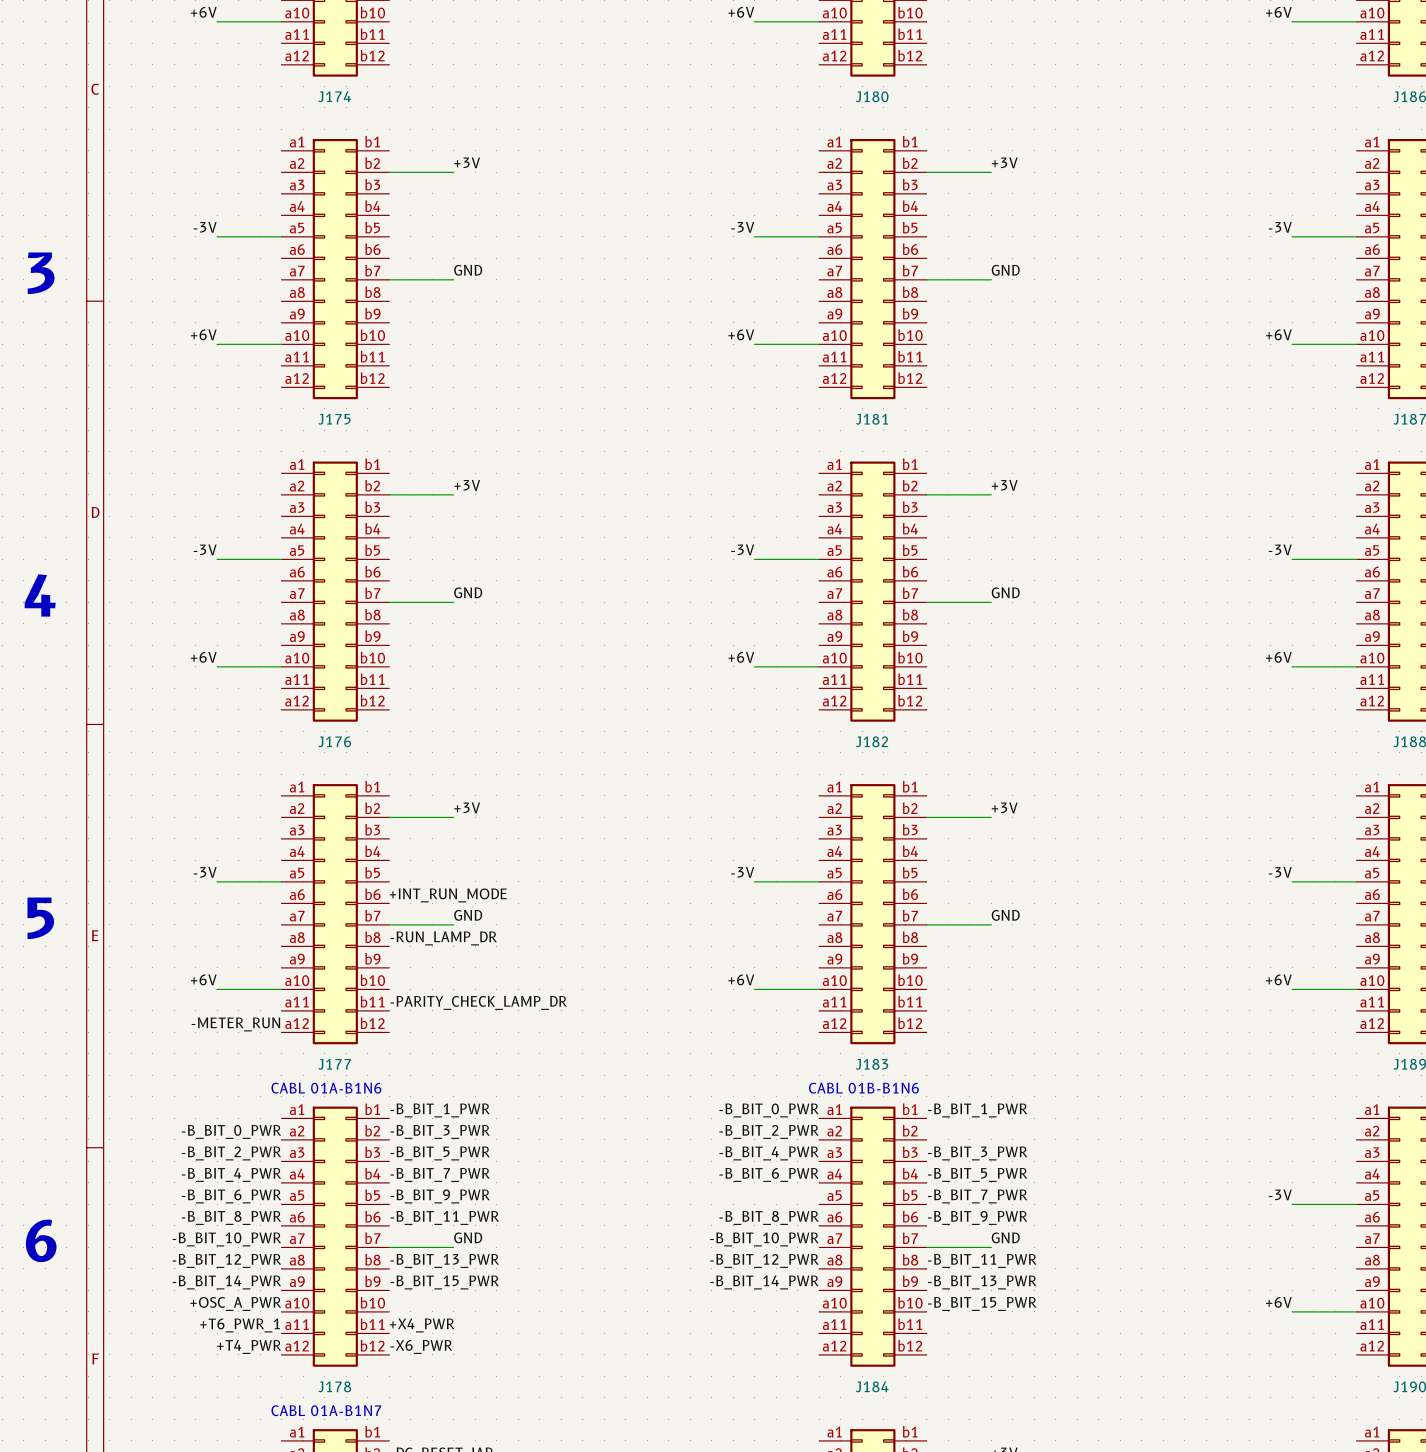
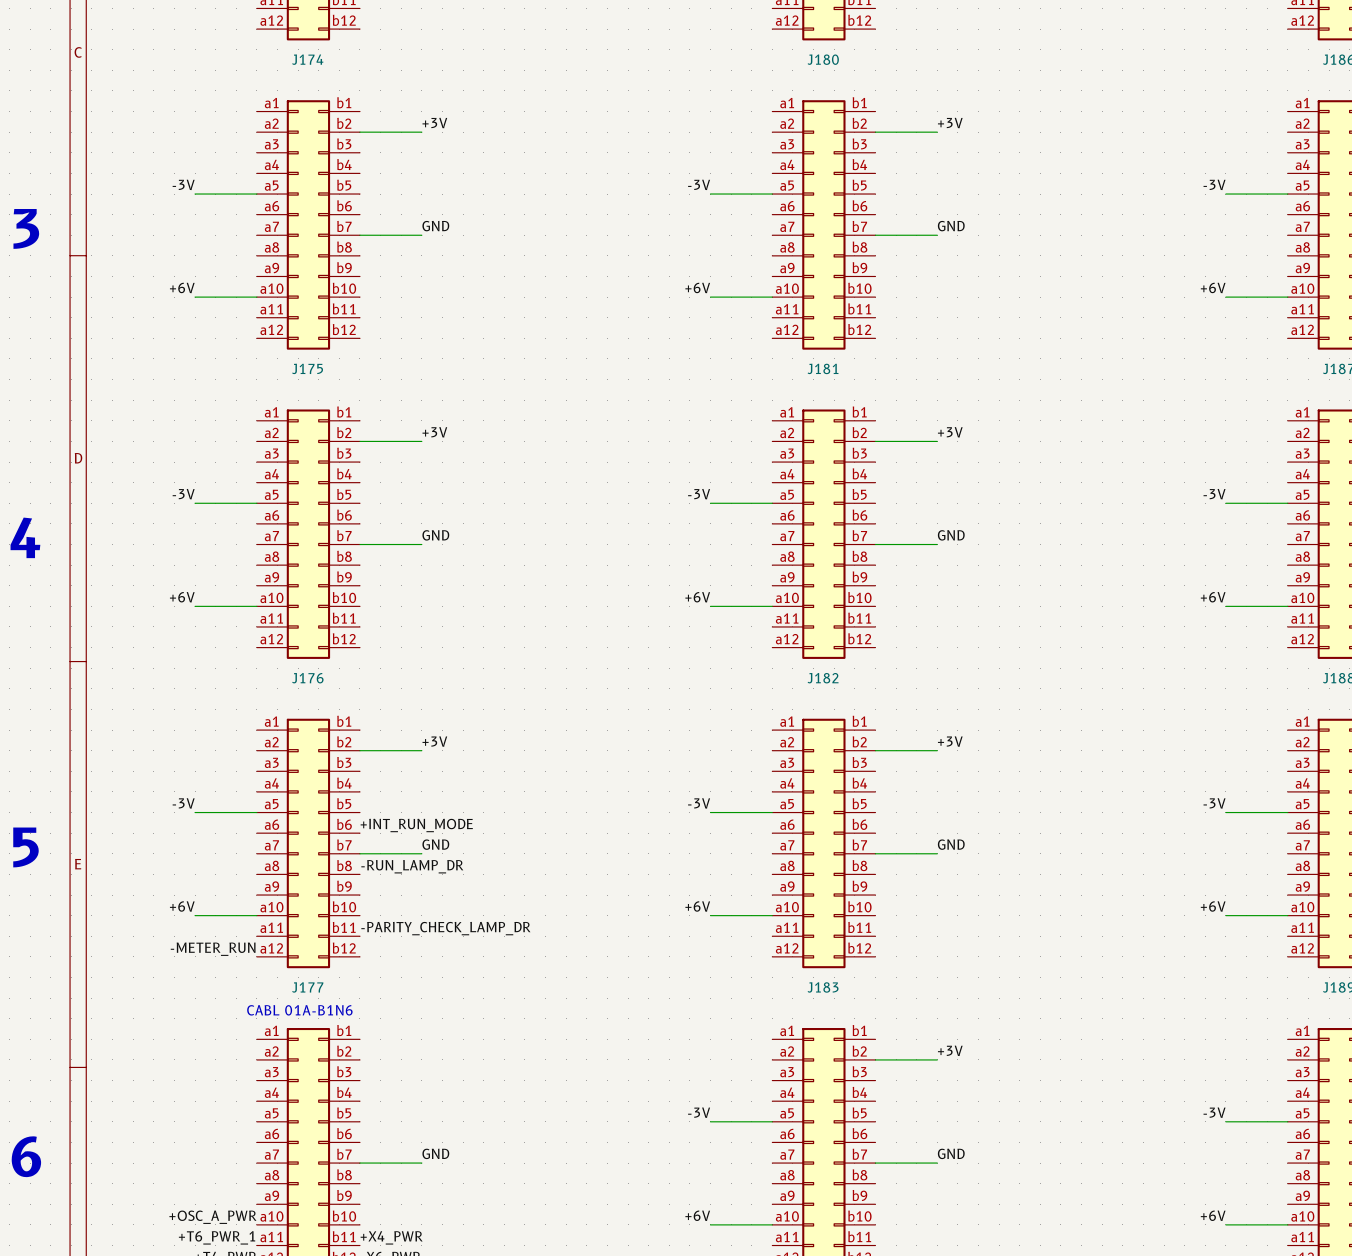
text: CABL 01B-B1N6 (863, 1088) -> none
label: -B_BIT_1_PWR (440, 1110) -> none
label: -B_BIT_0_PWR (769, 1110) -> none
label: -B_BIT_1_PWR (977, 1110) -> none
label: none -> +3V (950, 1050)
label: -B_BIT_0_PWR (231, 1131) -> none
label: -B_BIT_3_PWR (440, 1131) -> none
label: -B_BIT_2_PWR (769, 1131) -> none
wire: none -> (875, 1059) (937, 1059)
label: -B_BIT_2_PWR (231, 1153) -> none
label: -B_BIT_5_PWR (440, 1153) -> none
label: -B_BIT_4_PWR (769, 1153) -> none
label: -B_BIT_3_PWR (977, 1153) -> none
label: -B_BIT_4_PWR (231, 1174) -> none
label: -B_BIT_7_PWR (440, 1174) -> none
label: -B_BIT_6_PWR (769, 1174) -> none
label: -B_BIT_5_PWR (977, 1174) -> none
label: none -> -3V (699, 1112)
label: -B_BIT_6_PWR (231, 1196) -> none
label: -B_BIT_9_PWR (440, 1196) -> none
label: -B_BIT_7_PWR (977, 1196) -> none
wire: none -> (710, 1121) (772, 1121)
label: -B_BIT_8_PWR (231, 1217) -> none
label: -B_BIT_11_PWR (444, 1217) -> none
label: -B_BIT_8_PWR (769, 1217) -> none
label: -B_BIT_9_PWR (977, 1217) -> none
label: -B_BIT_10_PWR (226, 1239) -> none
label: -B_BIT_10_PWR (764, 1239) -> none
label: -B_BIT_12_PWR (226, 1260) -> none
label: -B_BIT_13_PWR (444, 1260) -> none
label: -B_BIT_12_PWR (764, 1260) -> none
label: -B_BIT_11_PWR (982, 1260) -> none
label: -B_BIT_14_PWR (226, 1282) -> none
label: -B_BIT_15_PWR (444, 1282) -> none
label: -B_BIT_14_PWR (764, 1282) -> none
label: -B_BIT_13_PWR (982, 1282) -> none
label: none -> +6V (697, 1215)
label: -B_BIT_15_PWR (982, 1303) -> none
wire: none -> (710, 1224) (772, 1224)

